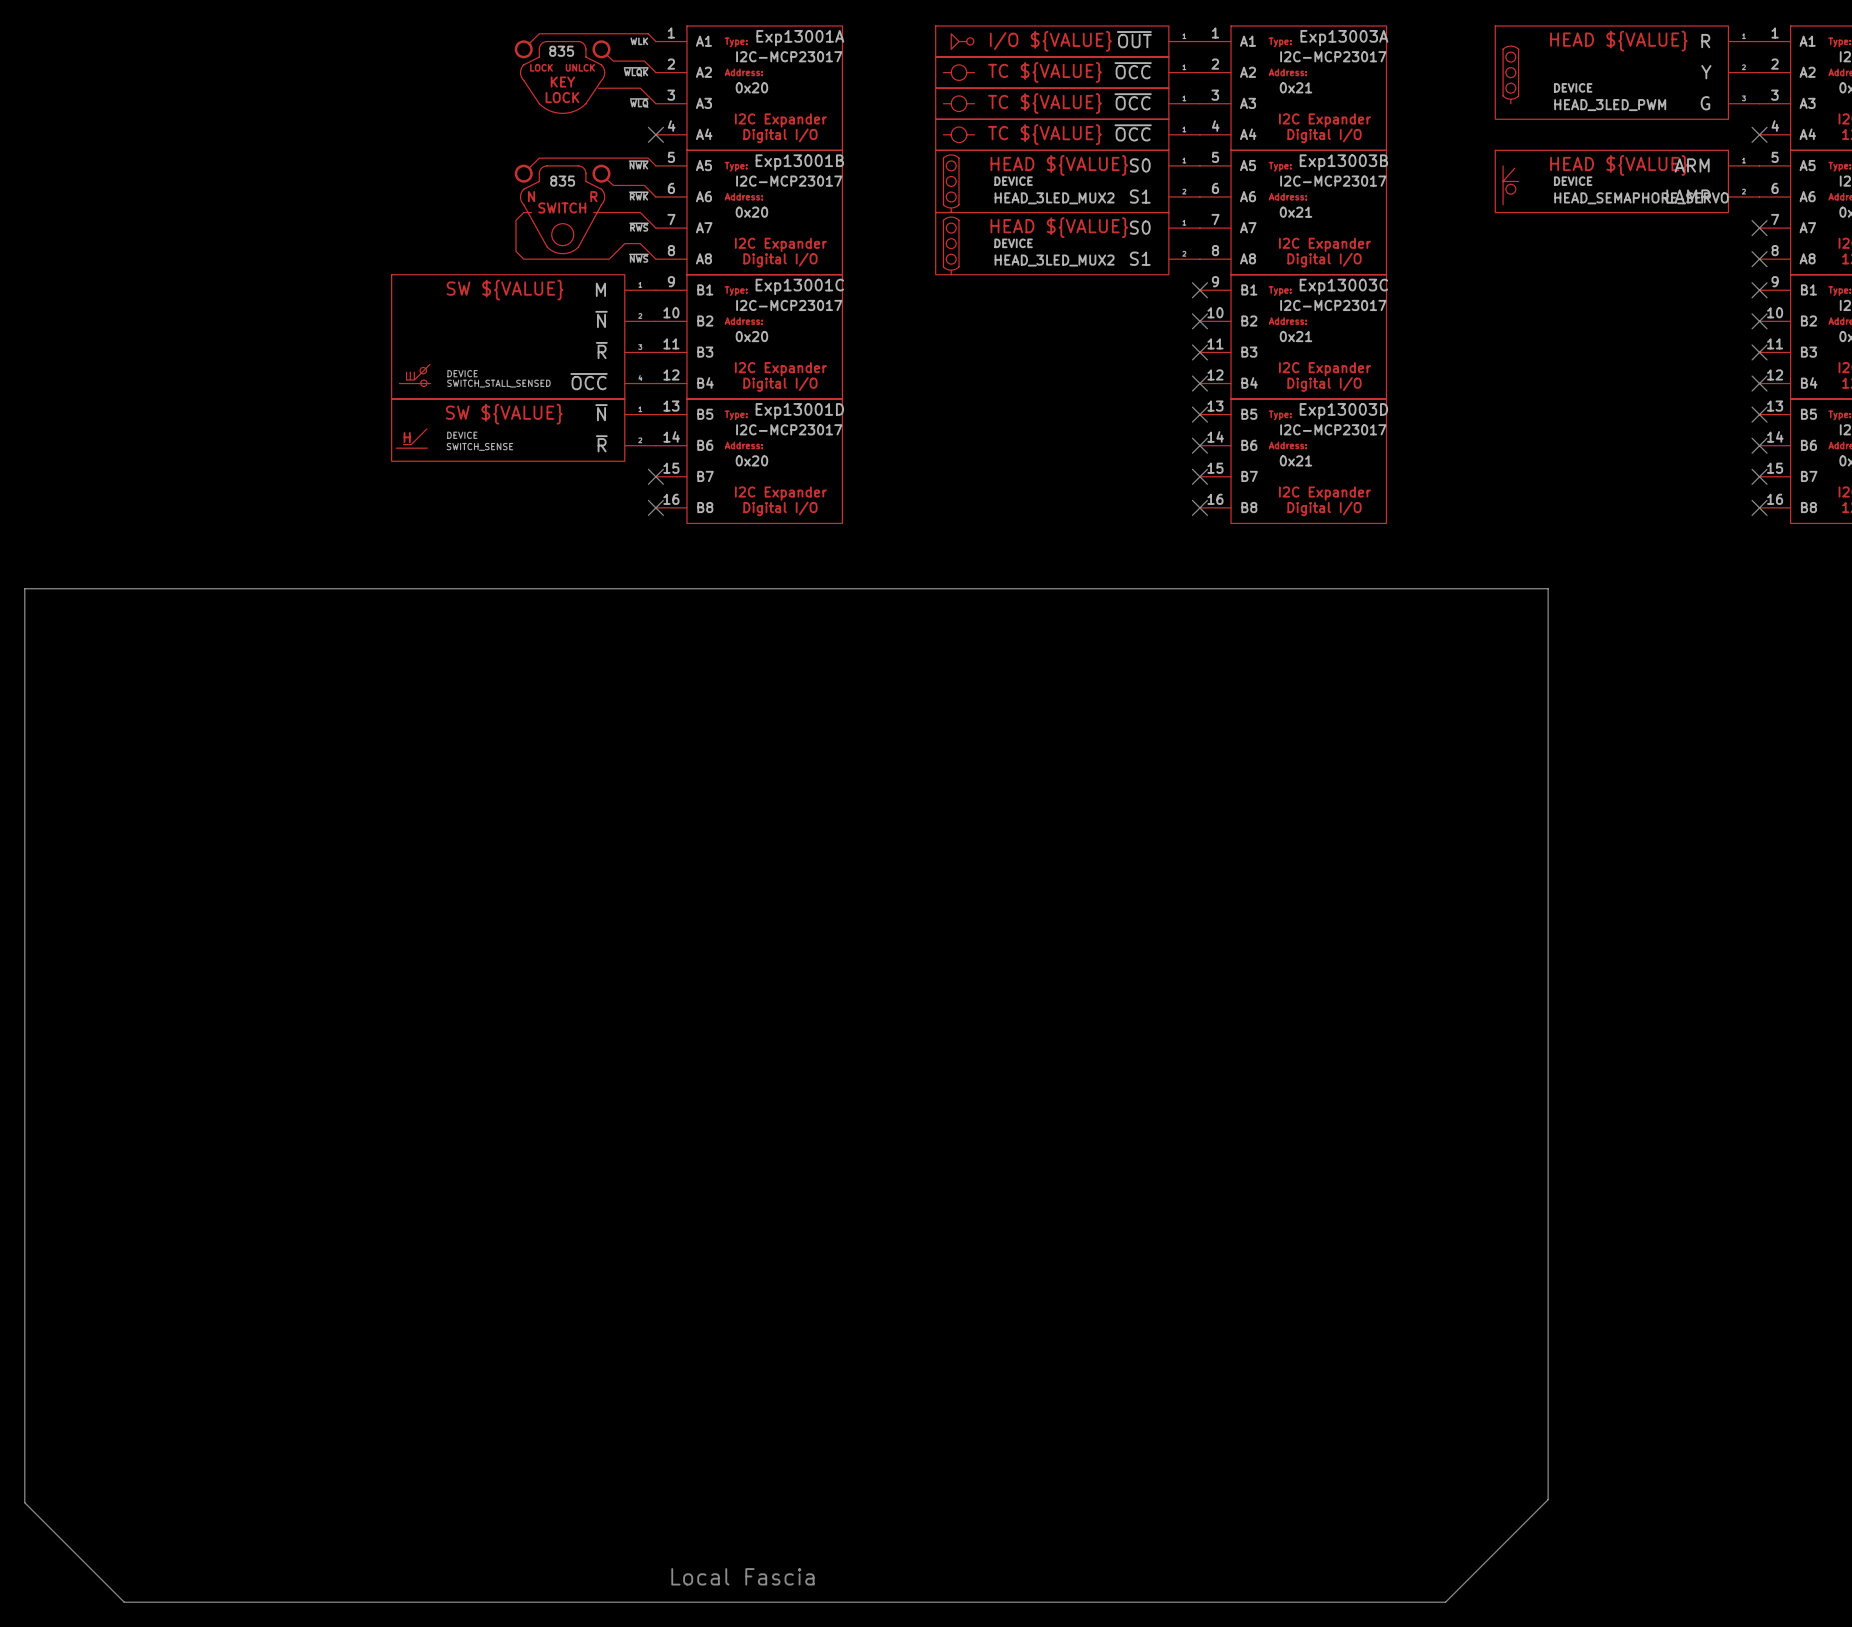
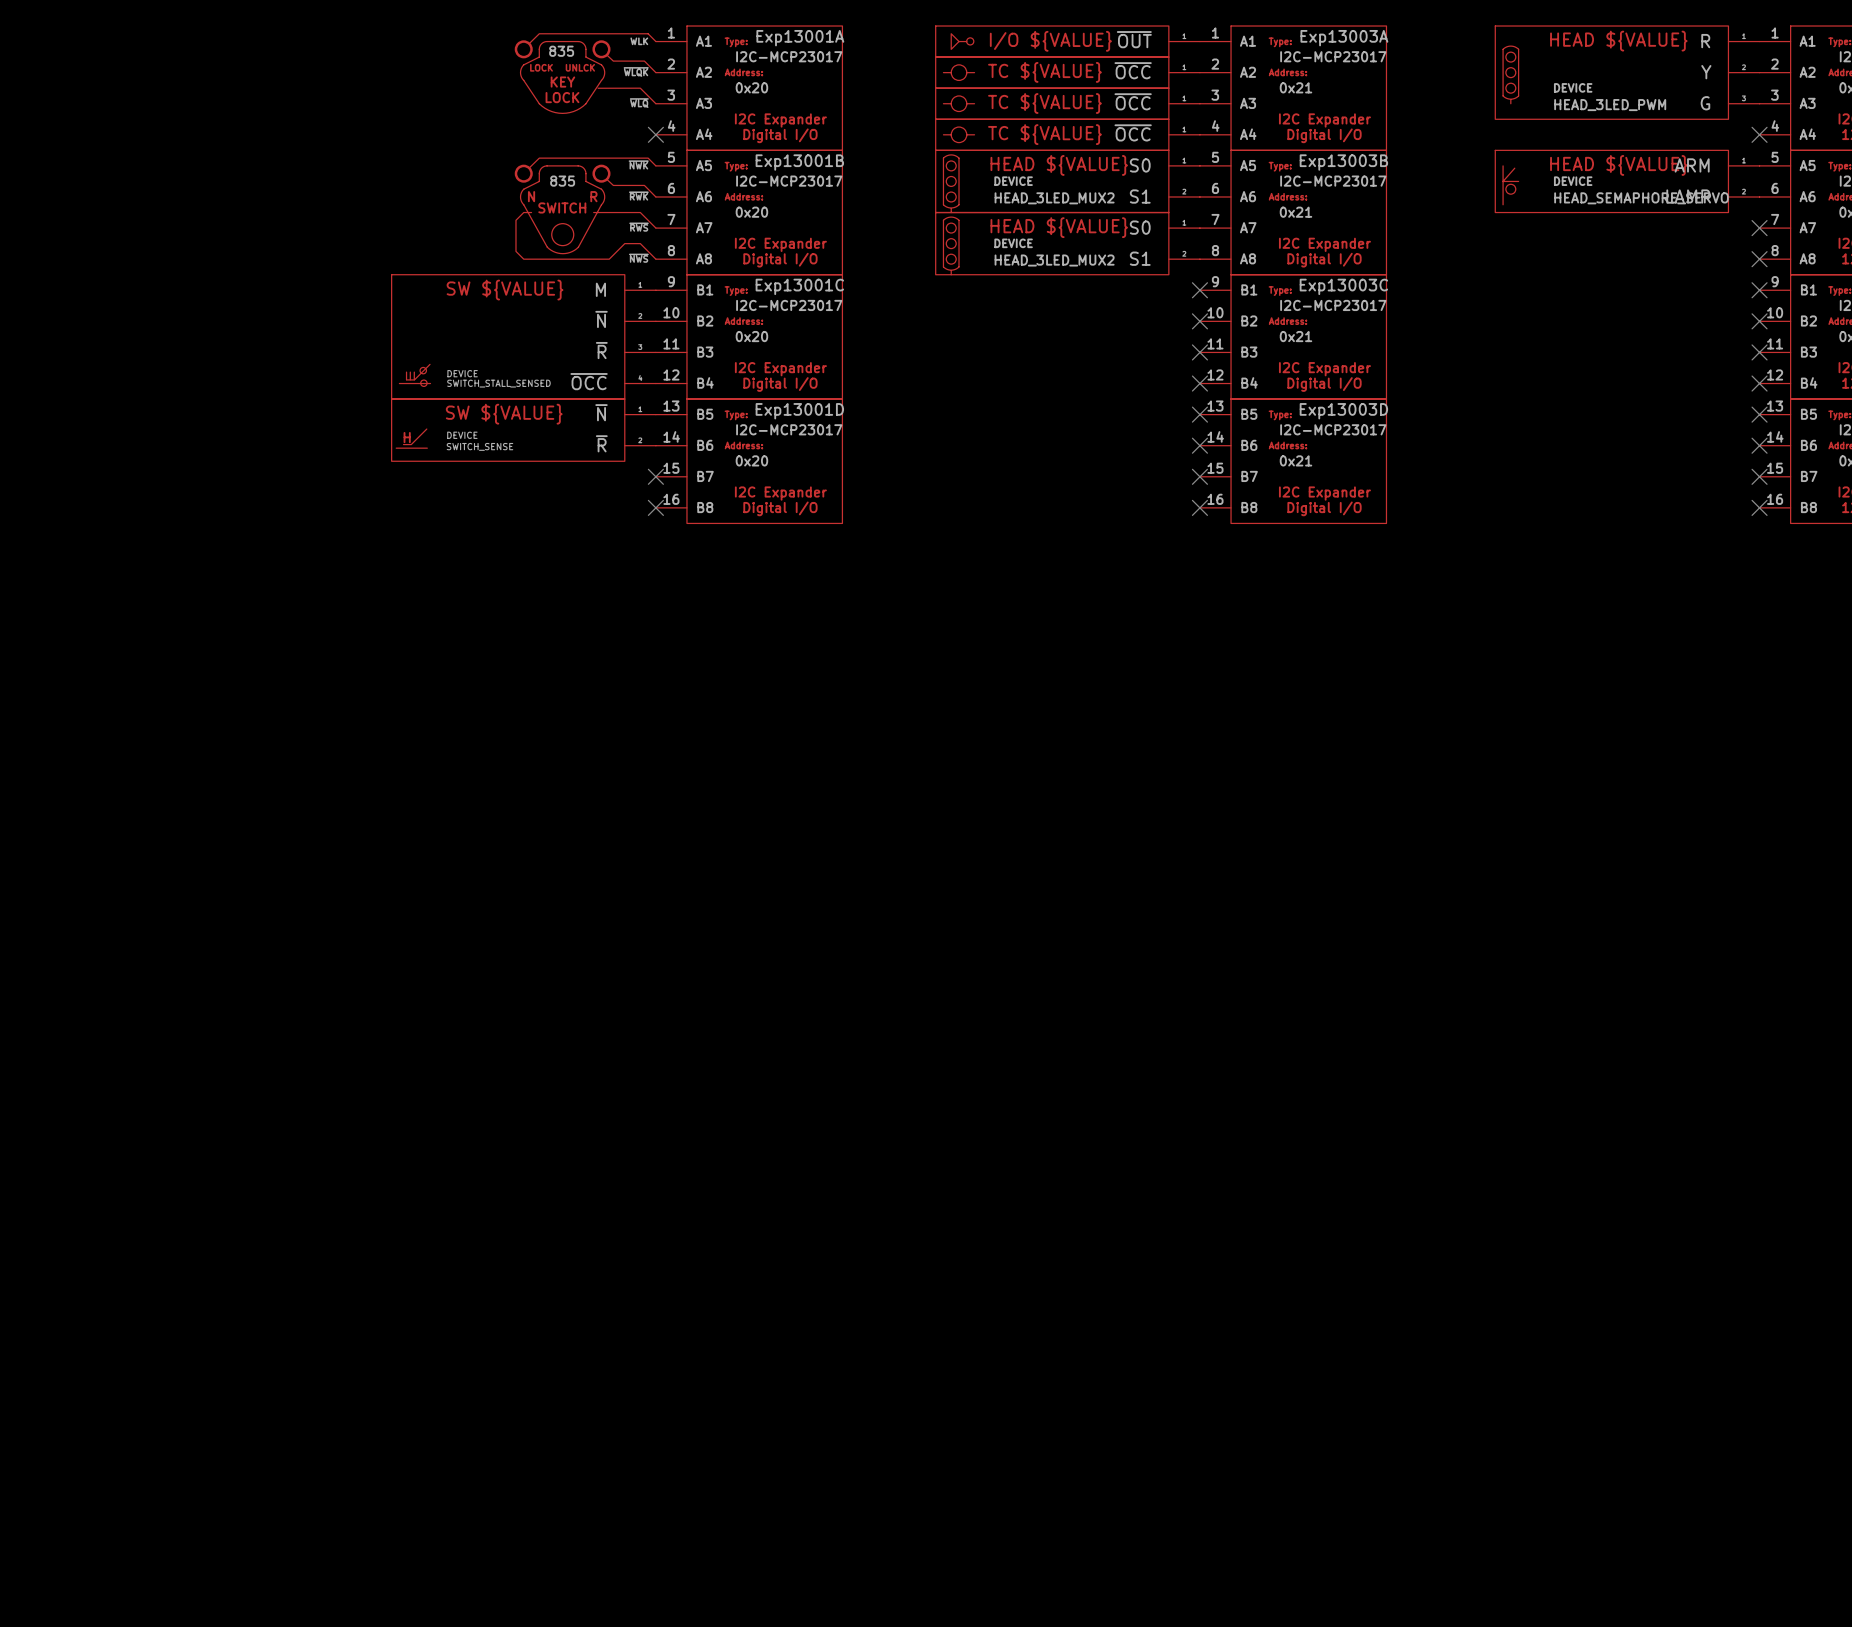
line: (24, 588) (24, 1502) (124, 1602) (1445, 1602) (1548, 1499) (1548, 588) (24, 588) -> none
text: Local Fascia (742, 1576) -> none

